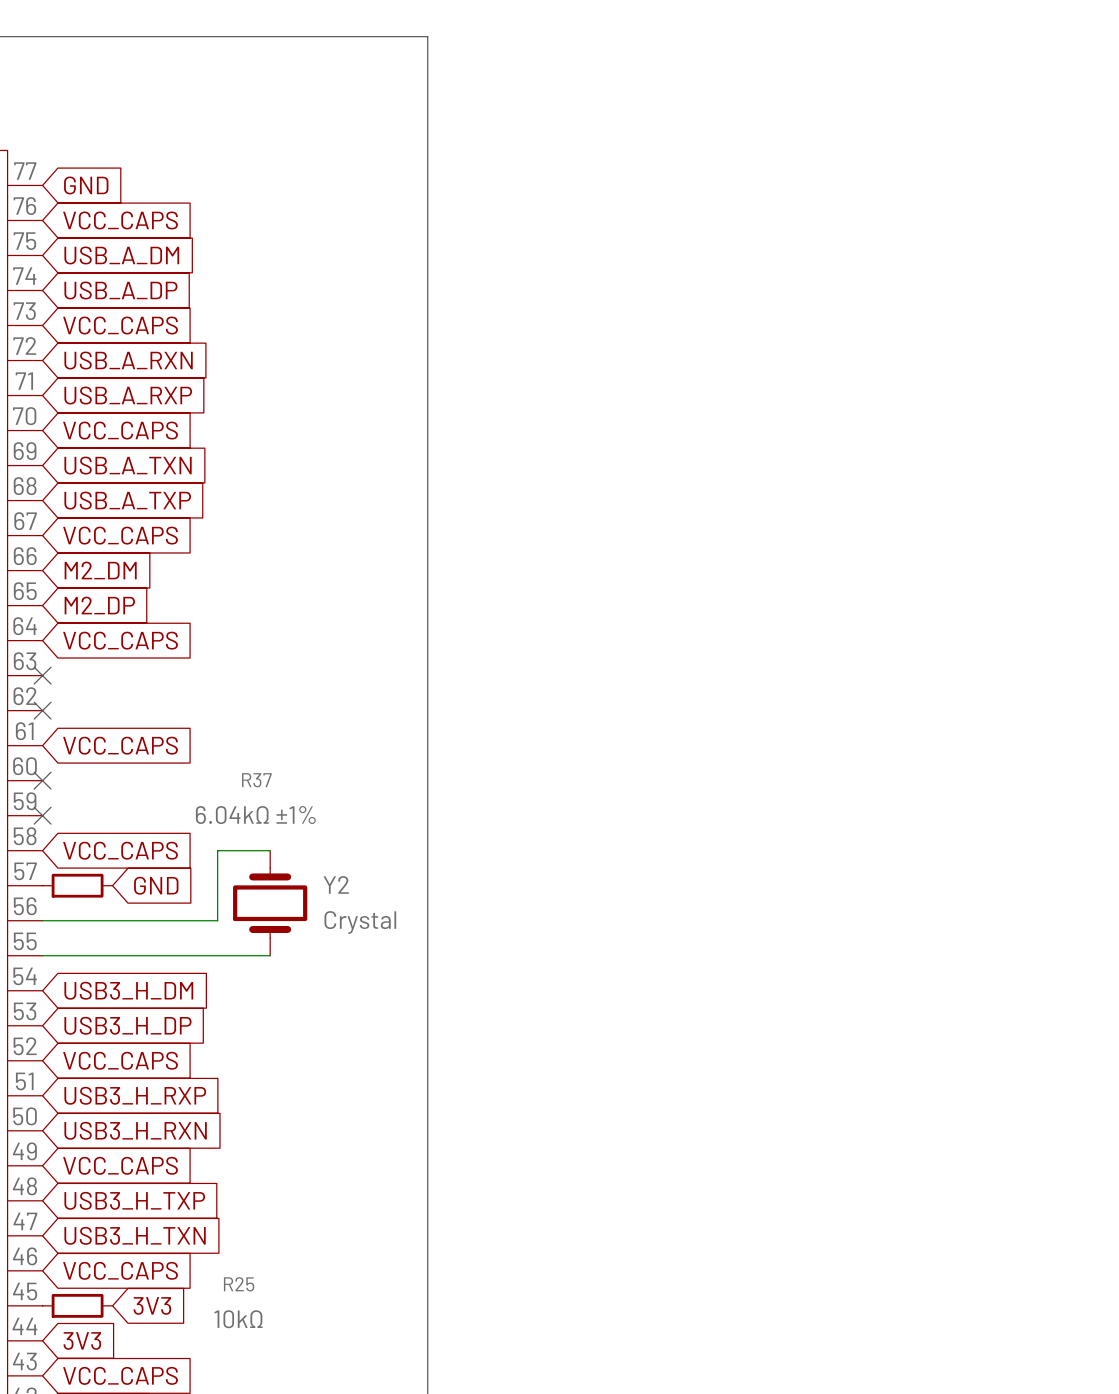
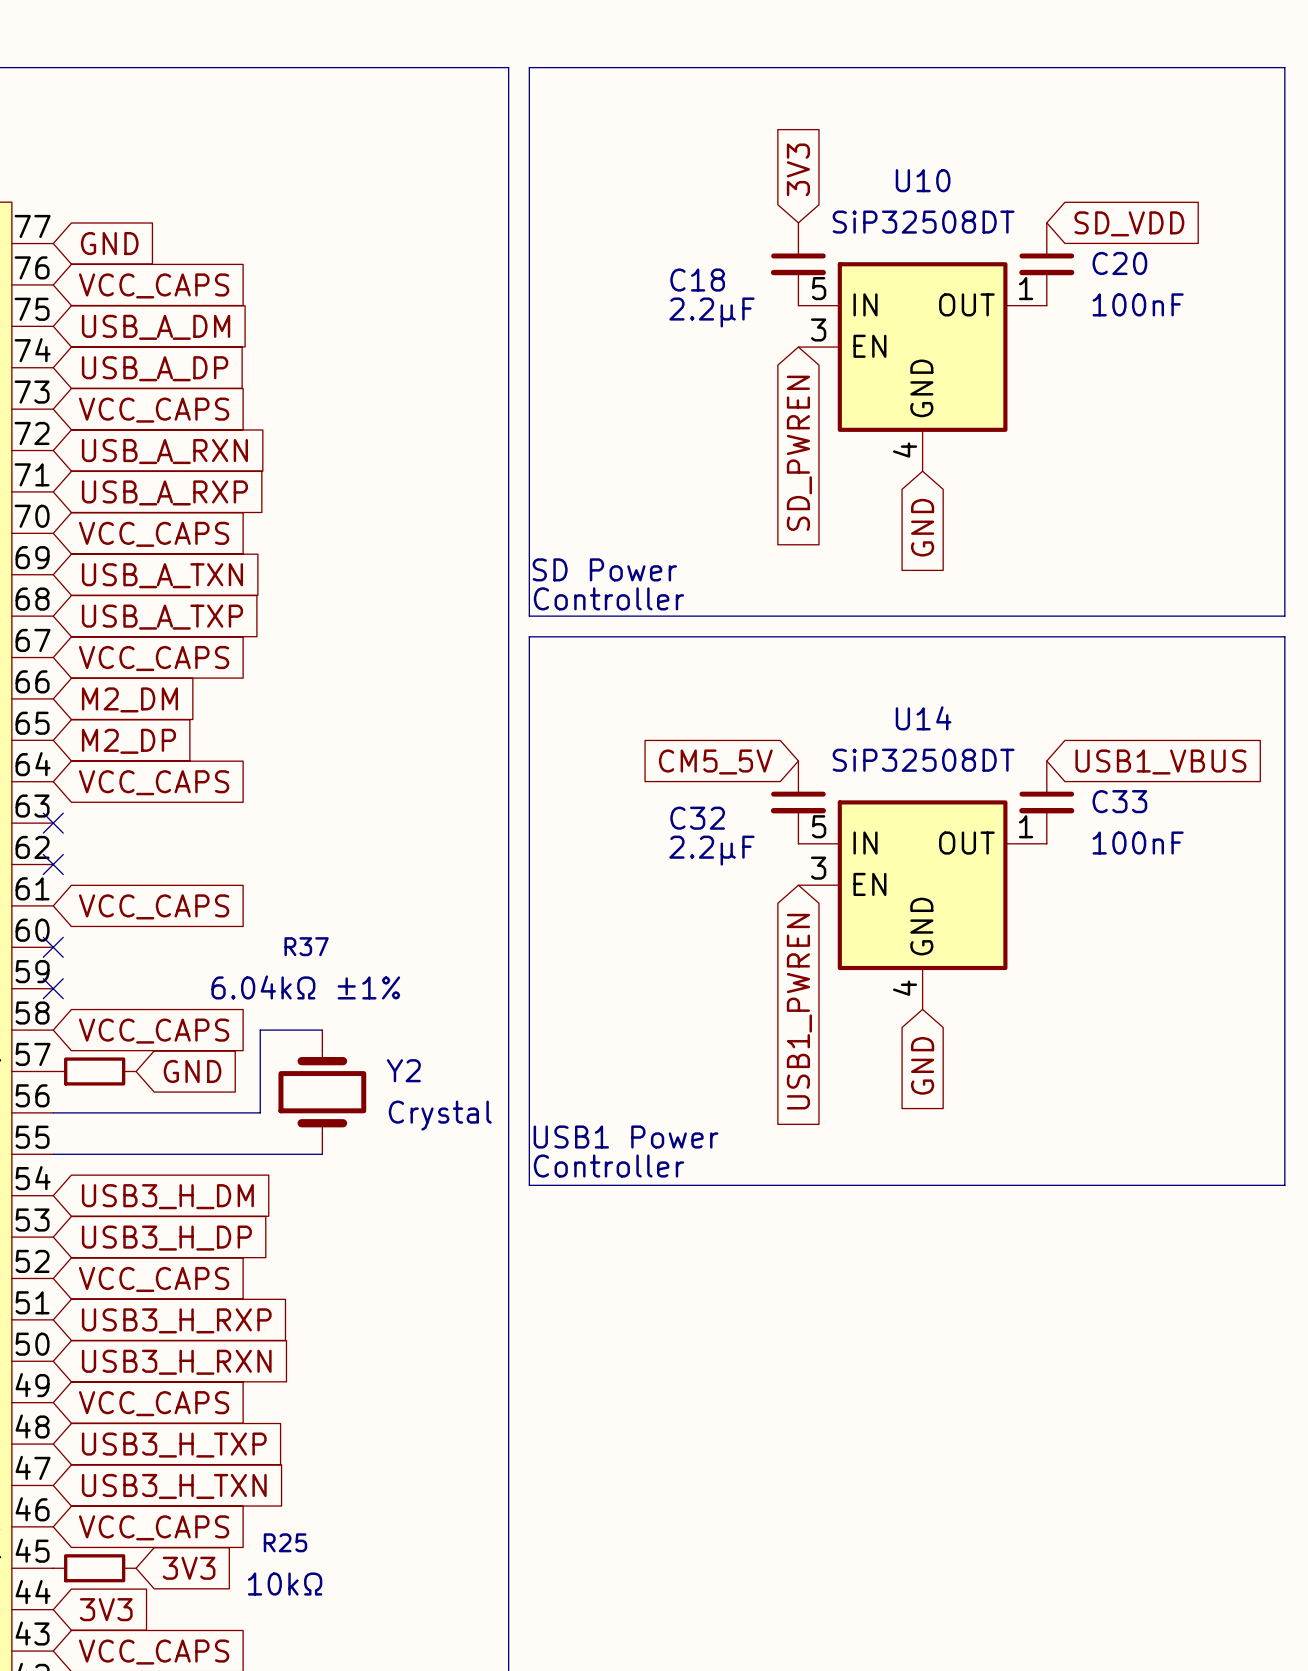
line: none -> (529, 67) (1284, 67) (1284, 616) (529, 616) (529, 67)
global label: none -> 3V3 (798, 169)
global label: none -> SD_VDD (1129, 223)
C18: none -> 2.2µF (798, 264)
C20: none -> 100nF (1046, 264)
U10: none -> SiP32508DT (922, 366)
global label: none -> SD_PWREN (799, 453)
global label: none -> GND (922, 527)
text: none -> SD Power (604, 569)
text: none -> Controller (608, 598)
line: none -> (529, 636) (529, 1185) (1284, 1185) (1284, 636) (529, 636)
global label: none -> CM5_5V (715, 762)
global label: none -> USB1_VBUS (1160, 762)
C32: none -> 2.2µF (798, 802)
C33: none -> 100nF (1046, 802)
U14: none -> SiP32508DT (922, 904)
global label: none -> USB1_PWREN (799, 1011)
global label: none -> GND (922, 1065)
text: none -> USB1 Power (626, 1137)
text: none -> Controller (608, 1166)

